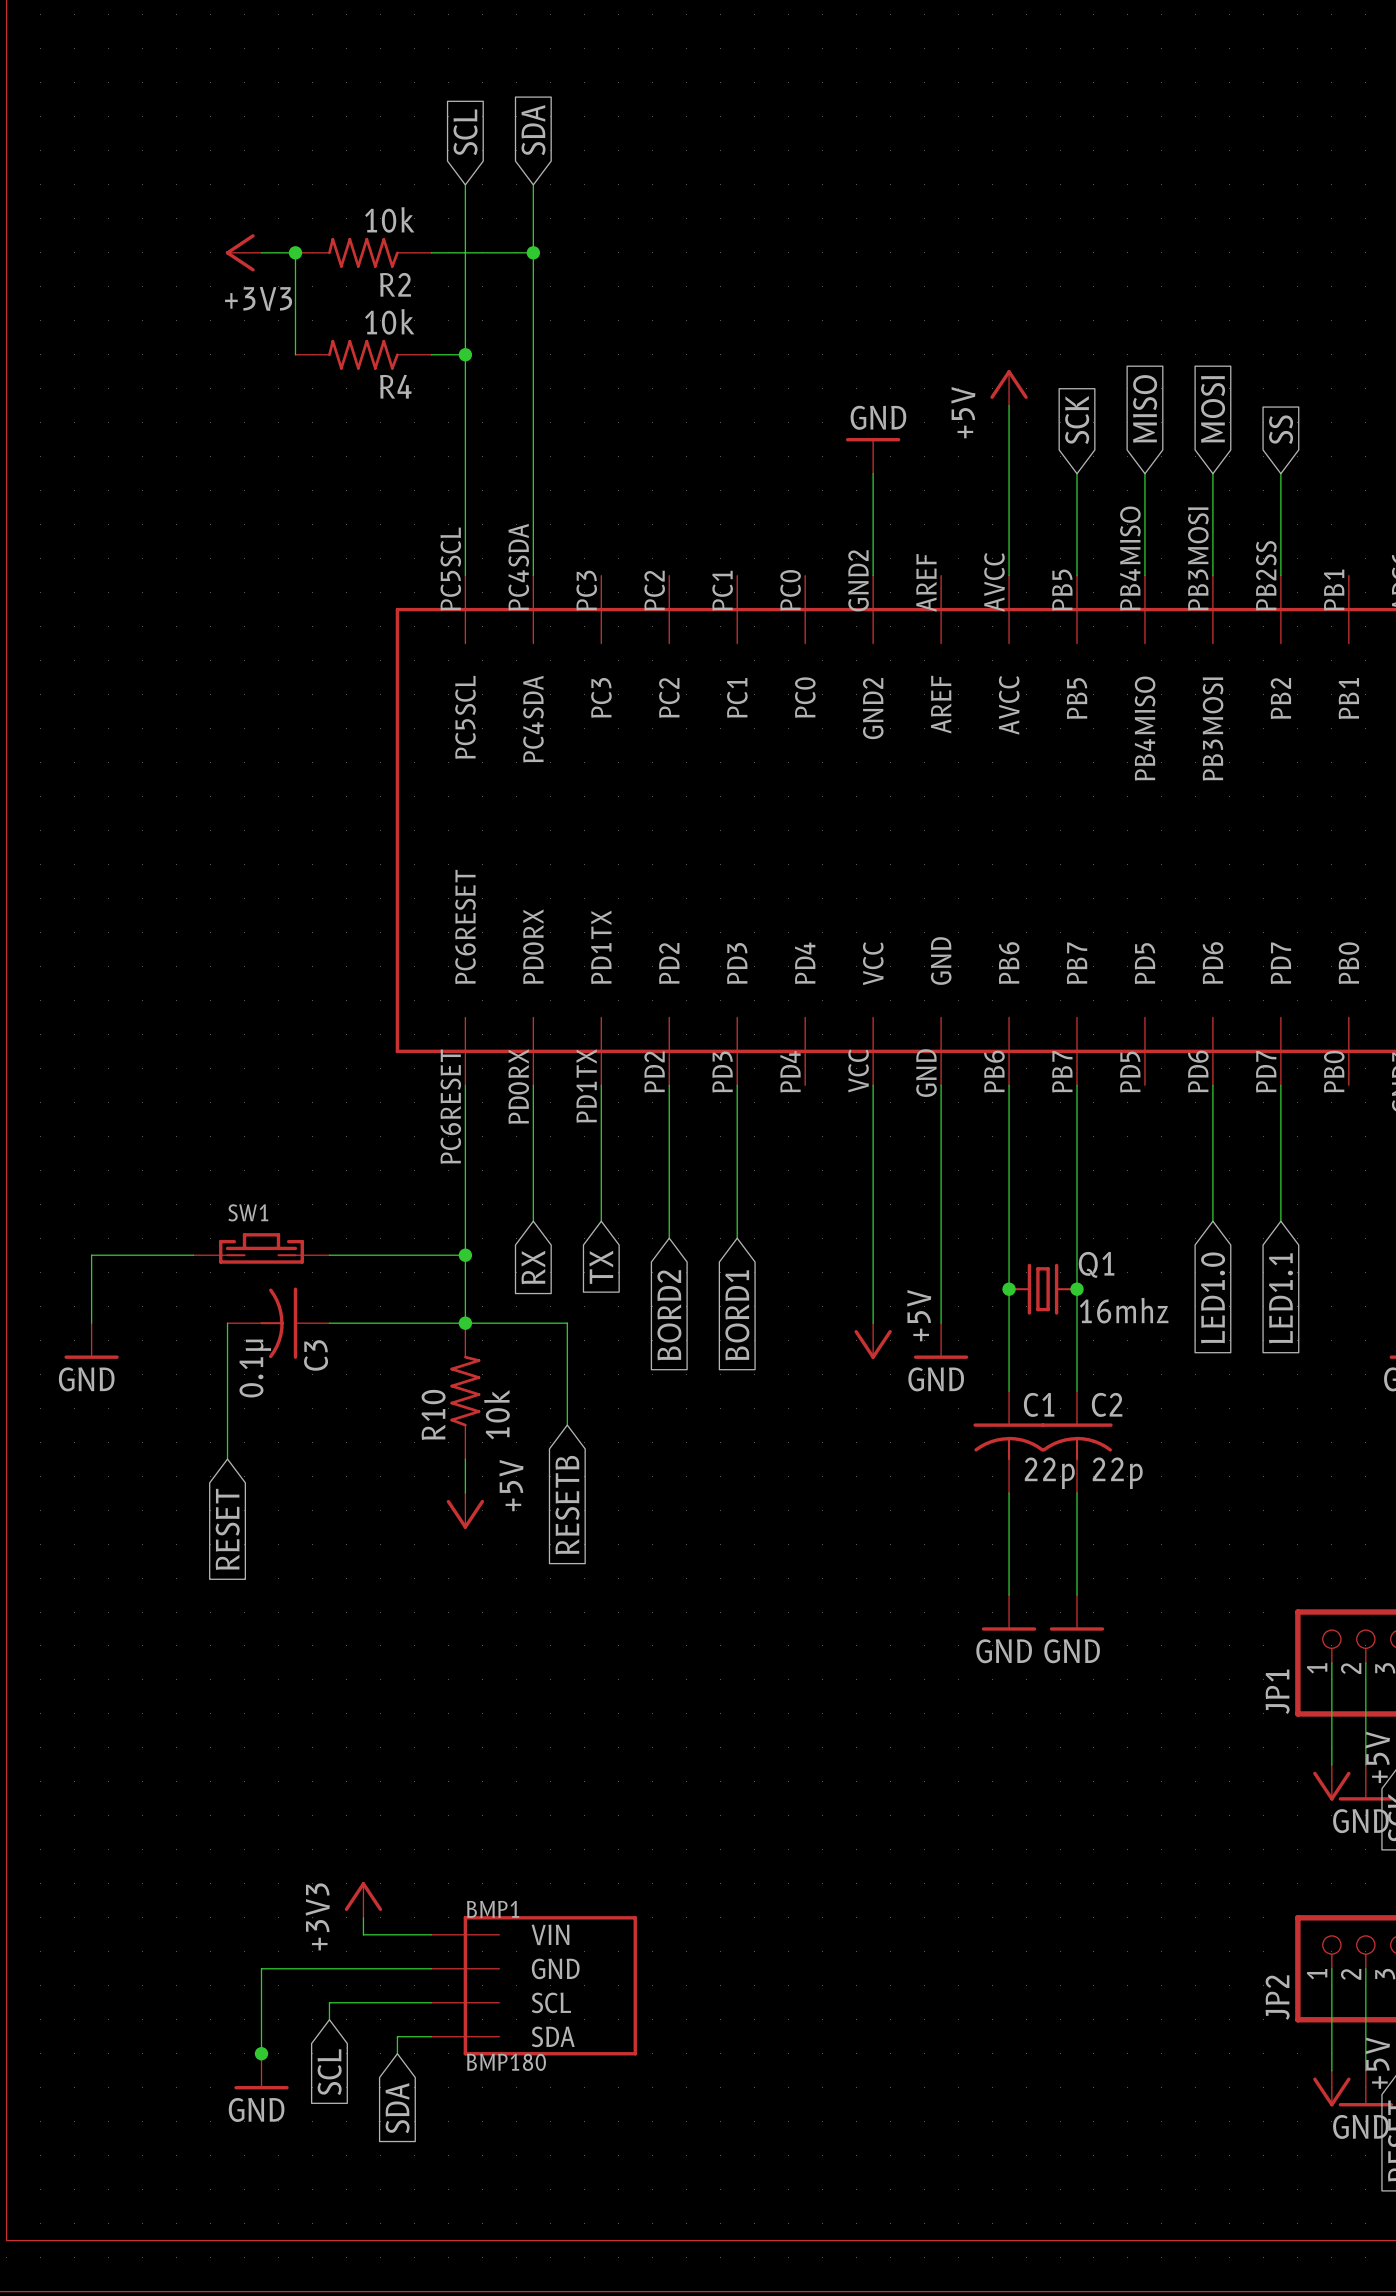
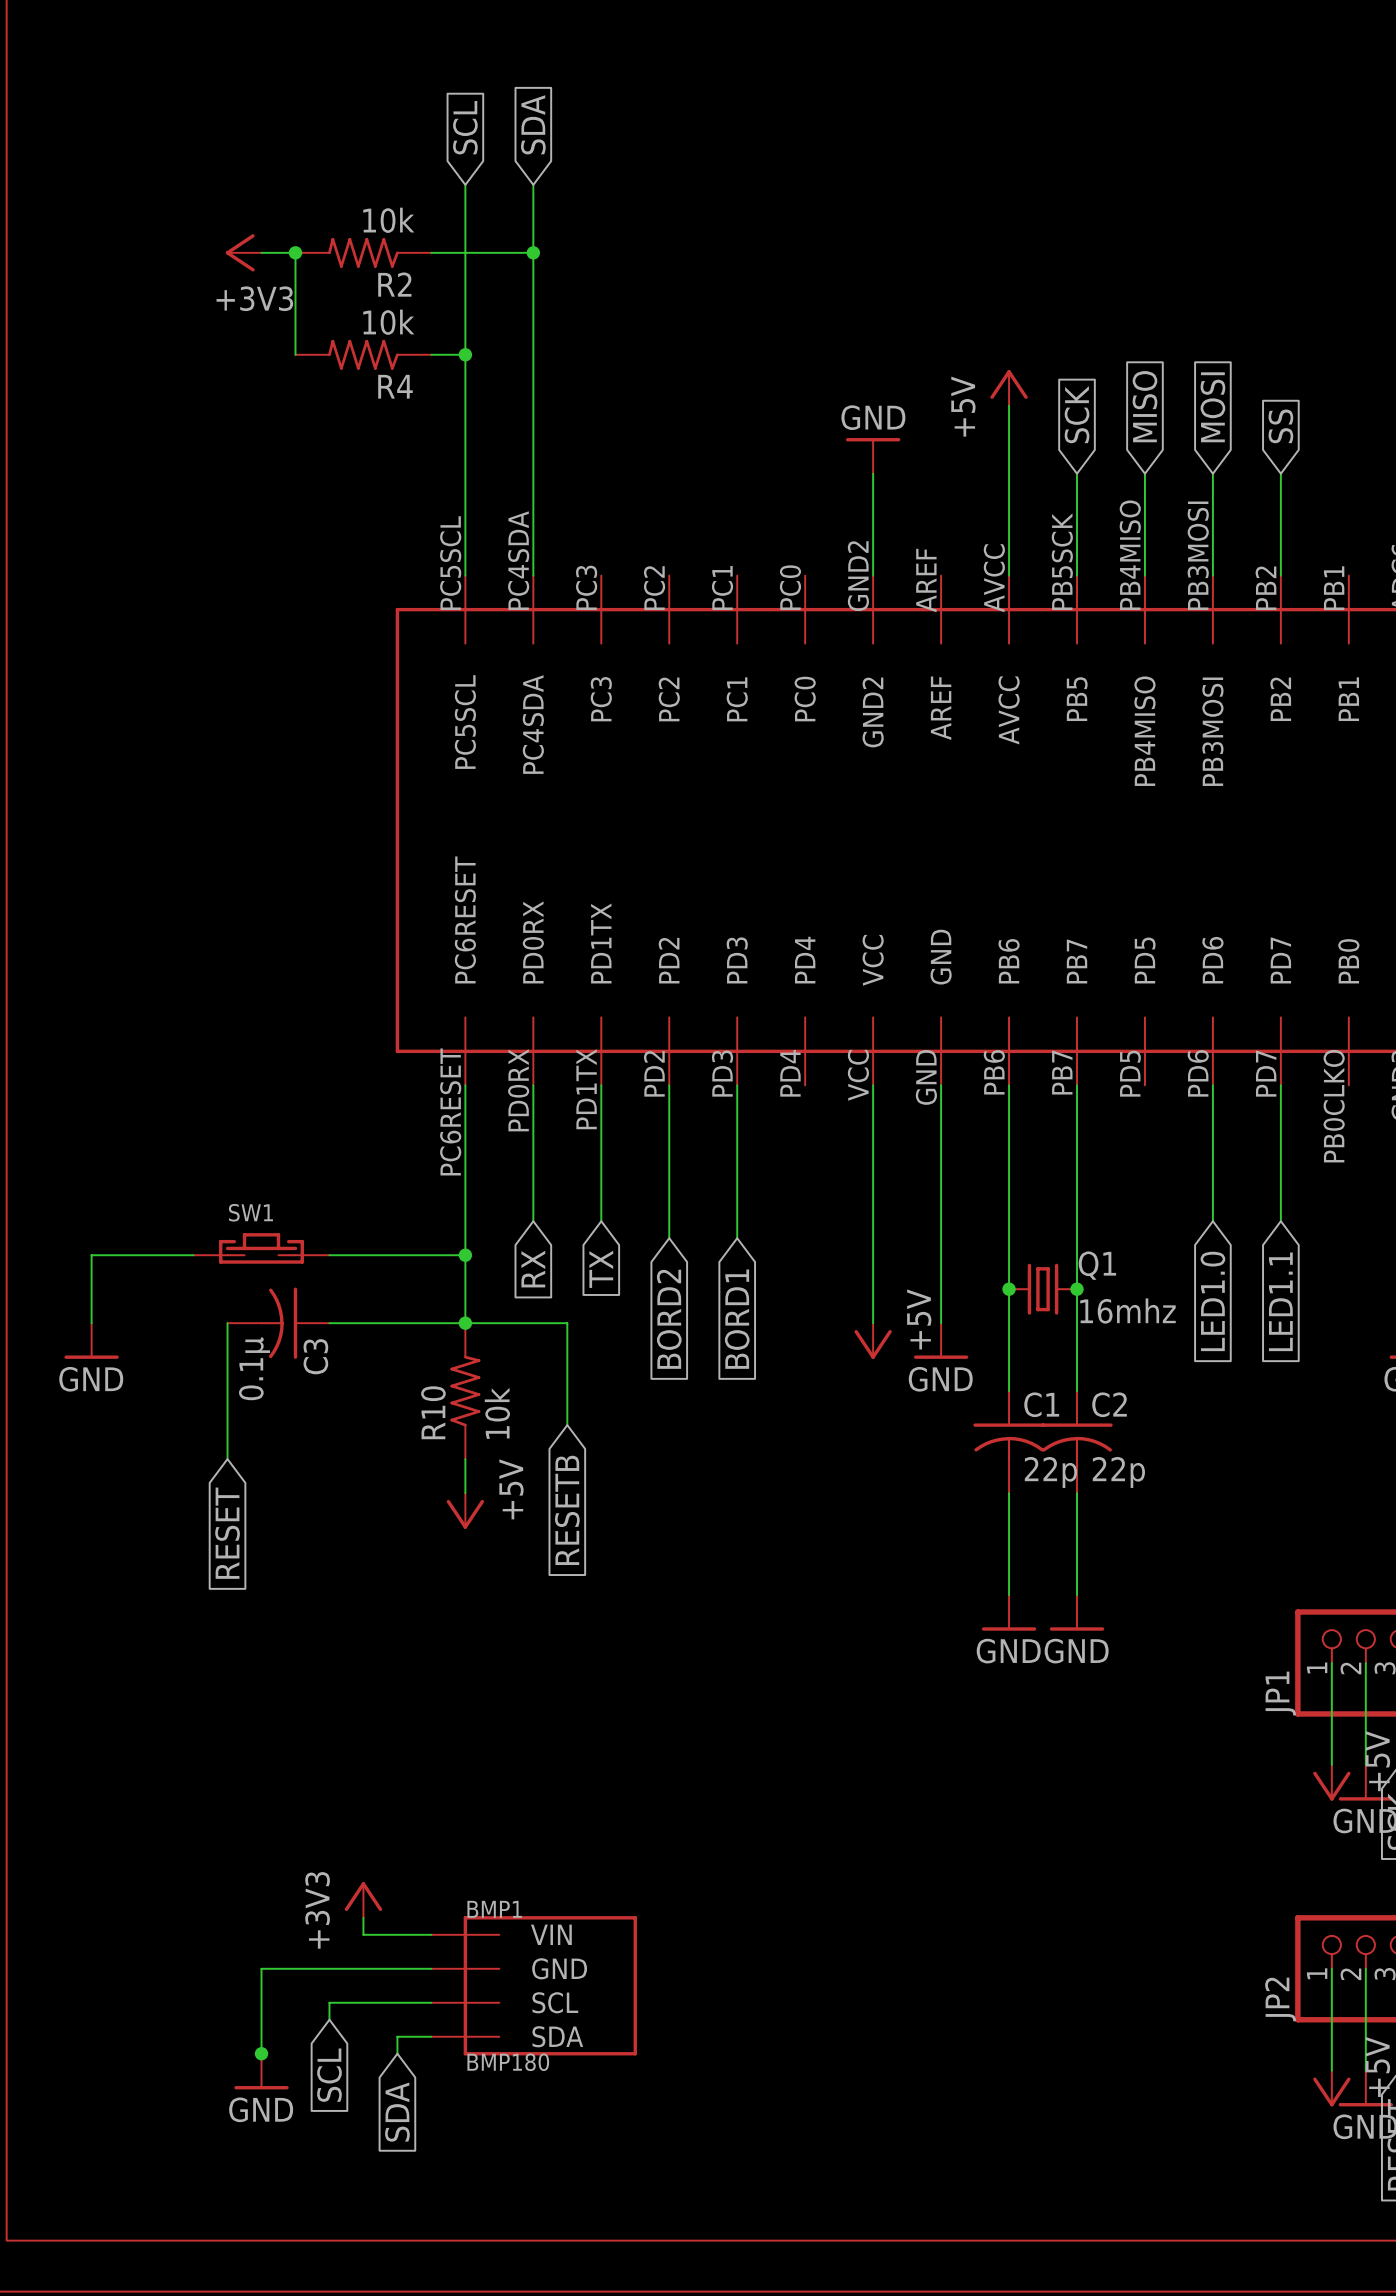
part pin number: PB2SS (1266, 575) -> PB2 (1265, 588)
part pin number: PB5 (1062, 590) -> PB5SCK (1062, 561)
part pin number: PB0 (1334, 1071) -> PB0CLKO (1334, 1106)

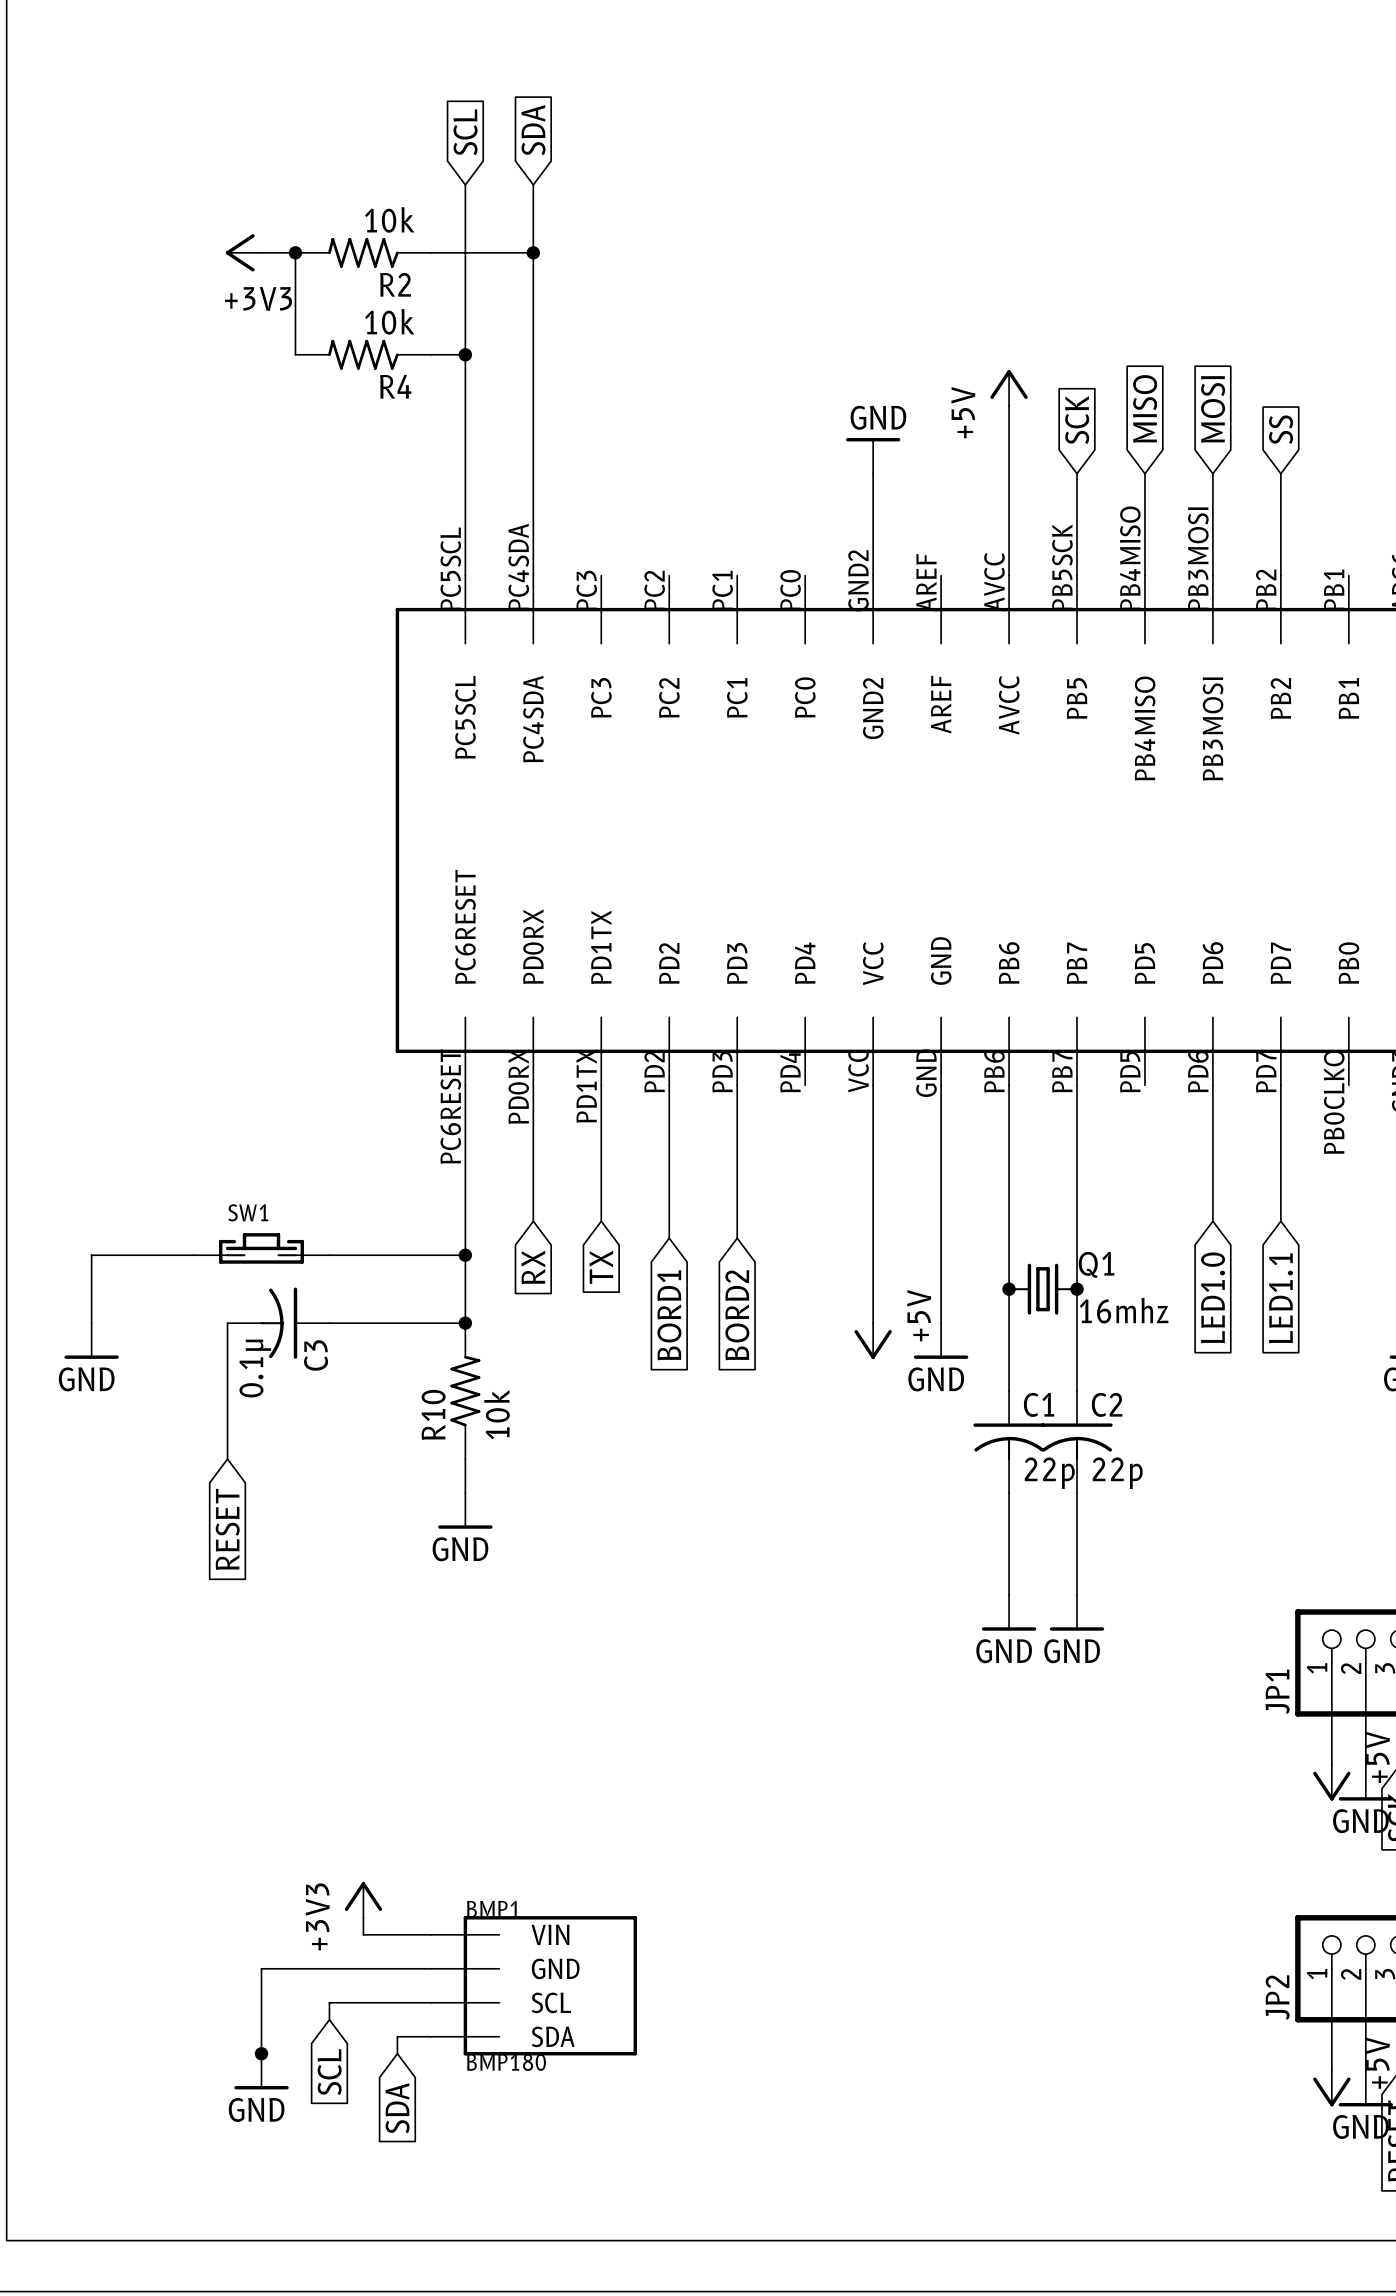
global label: BORD2 (669, 1319) -> BORD1 (669, 1315)
global label: BORD1 (737, 1319) -> BORD2 (737, 1315)
wire: (465, 1323) (567, 1323) (567, 1425) -> none
power symbol: +5V (465, 1510) -> GND (465, 1510)
global label: RESETB (567, 1510) -> none

